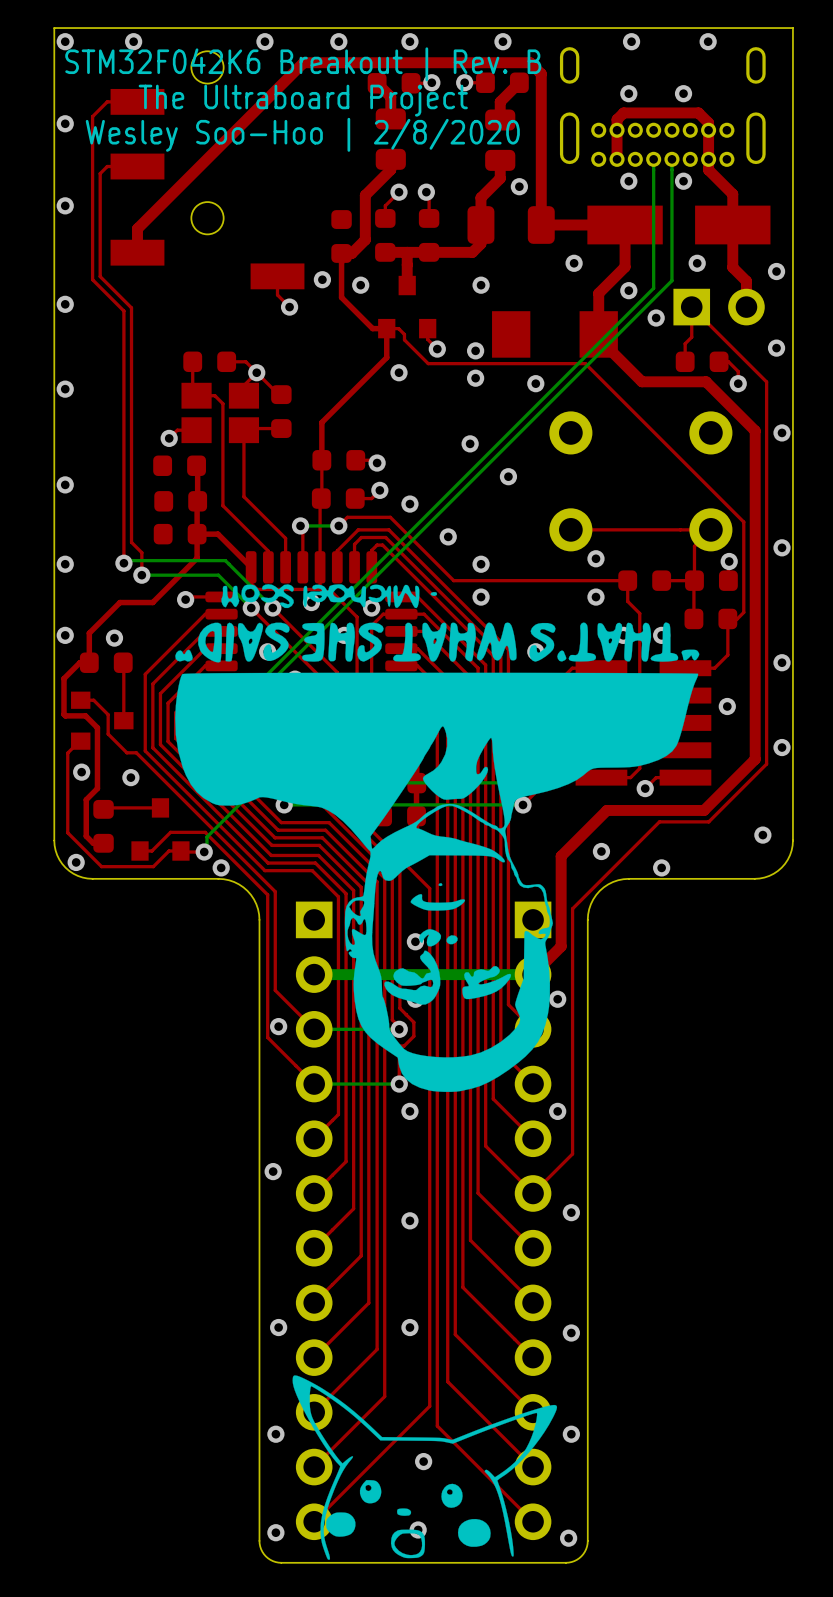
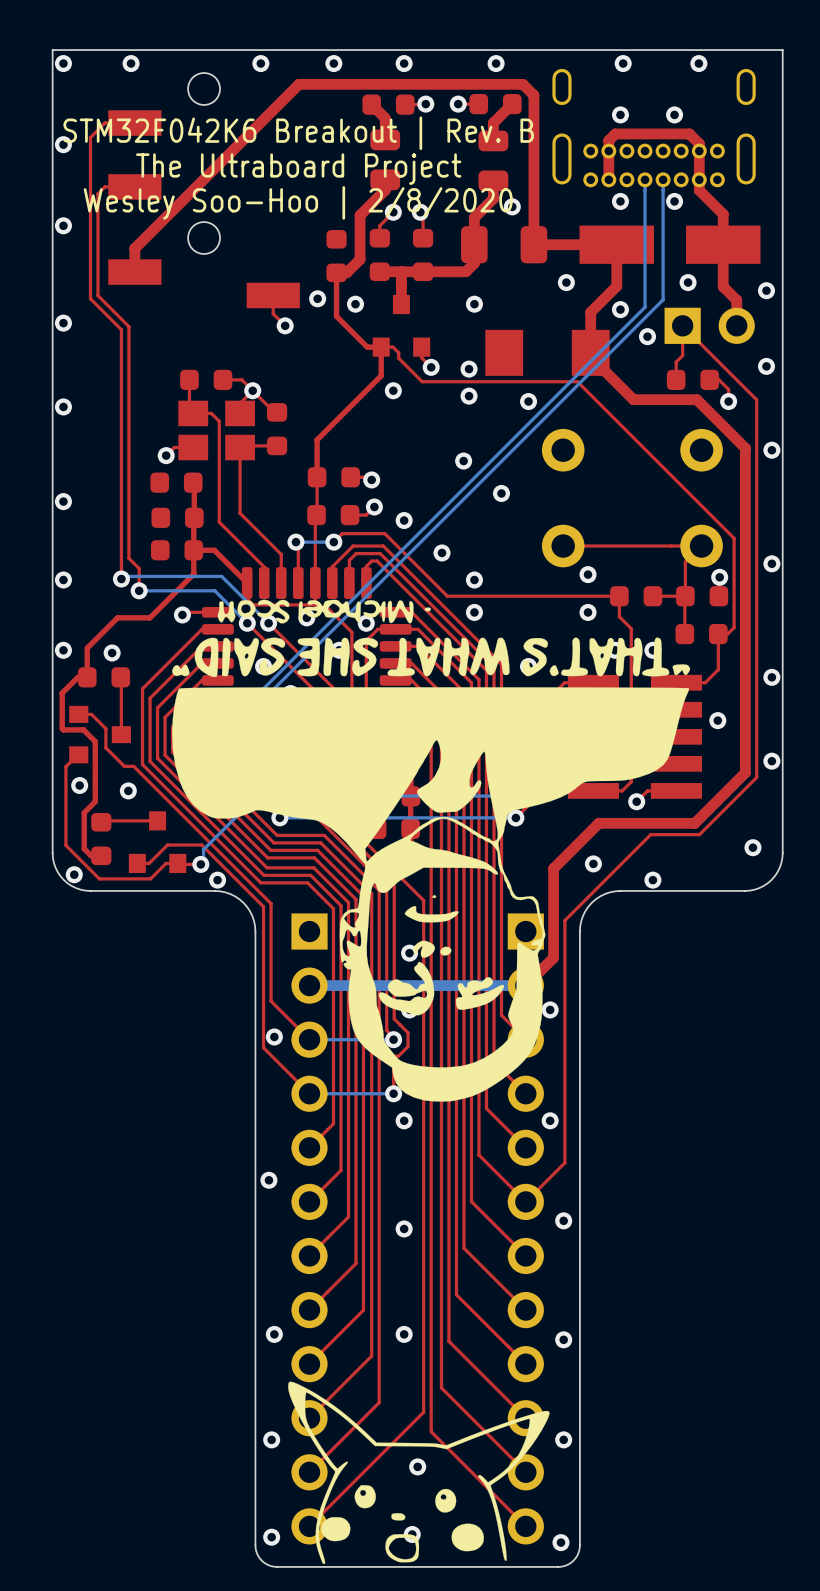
text position: STM32F042K6 Breakout | Rev. B (303, 64) -> STM32F042K6 Breakout | Rev. B (298, 133)
text position: The Ultraboard Project (303, 100) -> The Ultraboard Project (298, 169)
text position: Wesley Soo-Hoo | 2/8/2020 (302, 134) -> Wesley Soo-Hoo | 2/8/2020 (298, 202)

